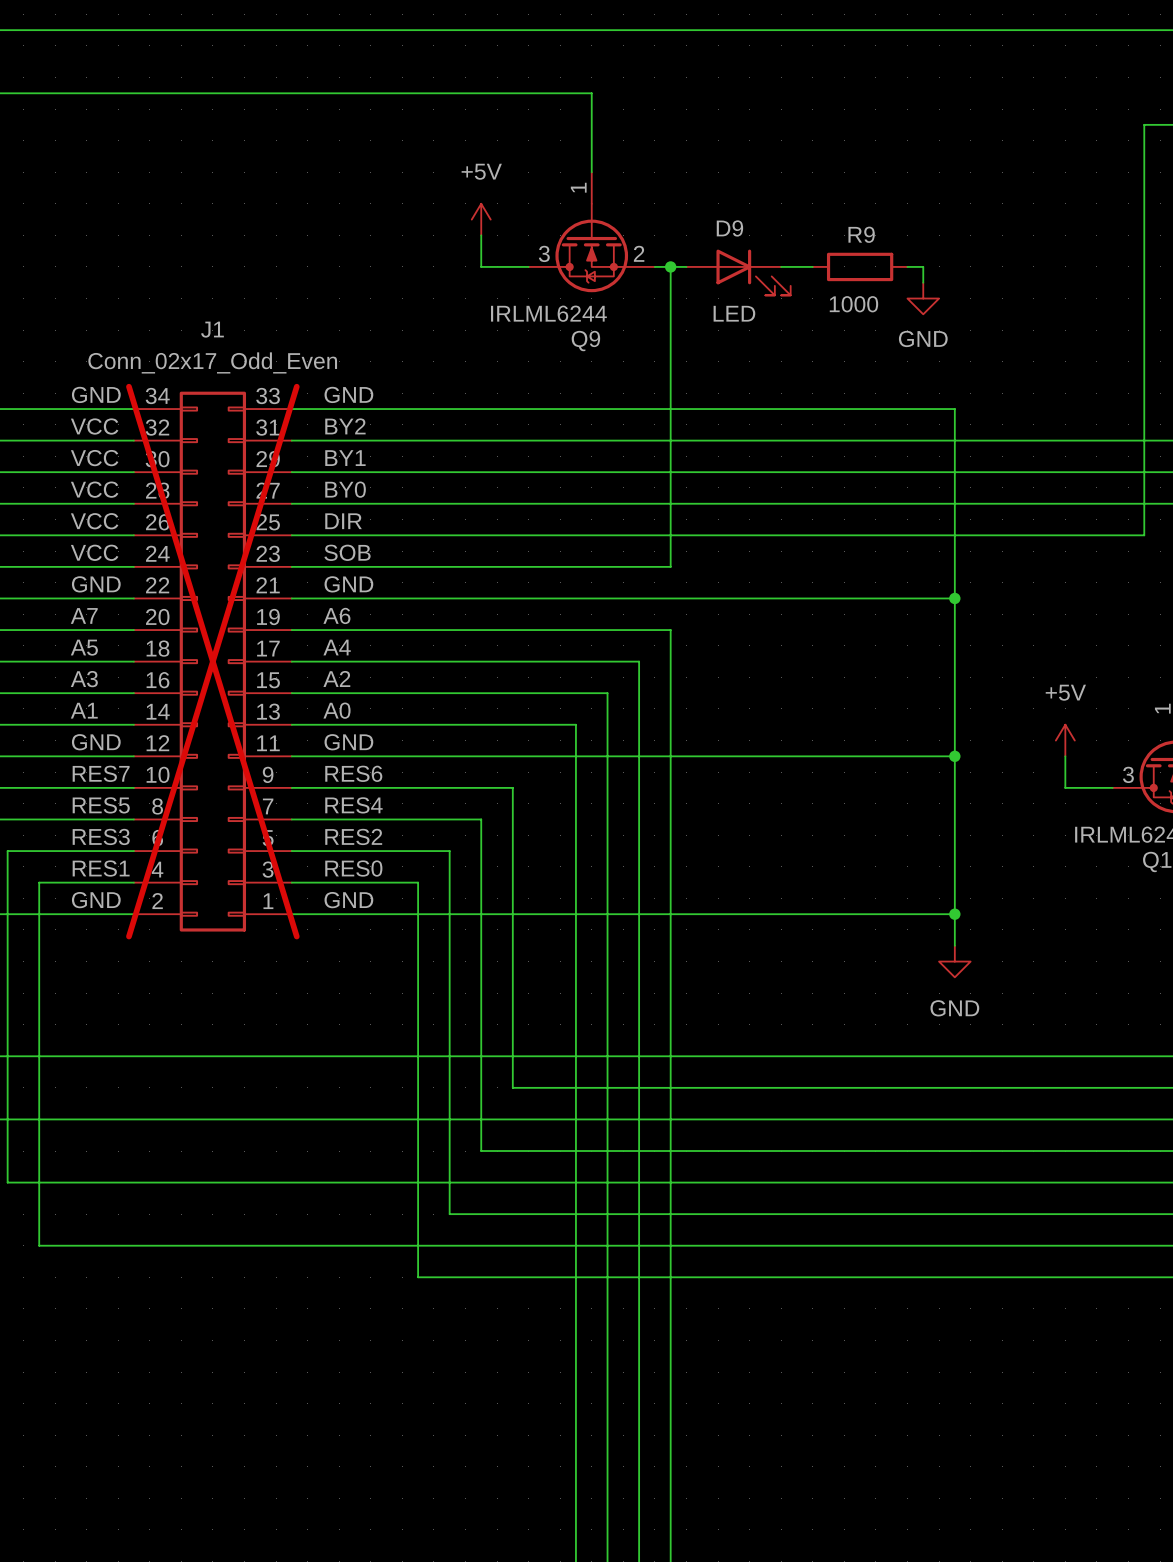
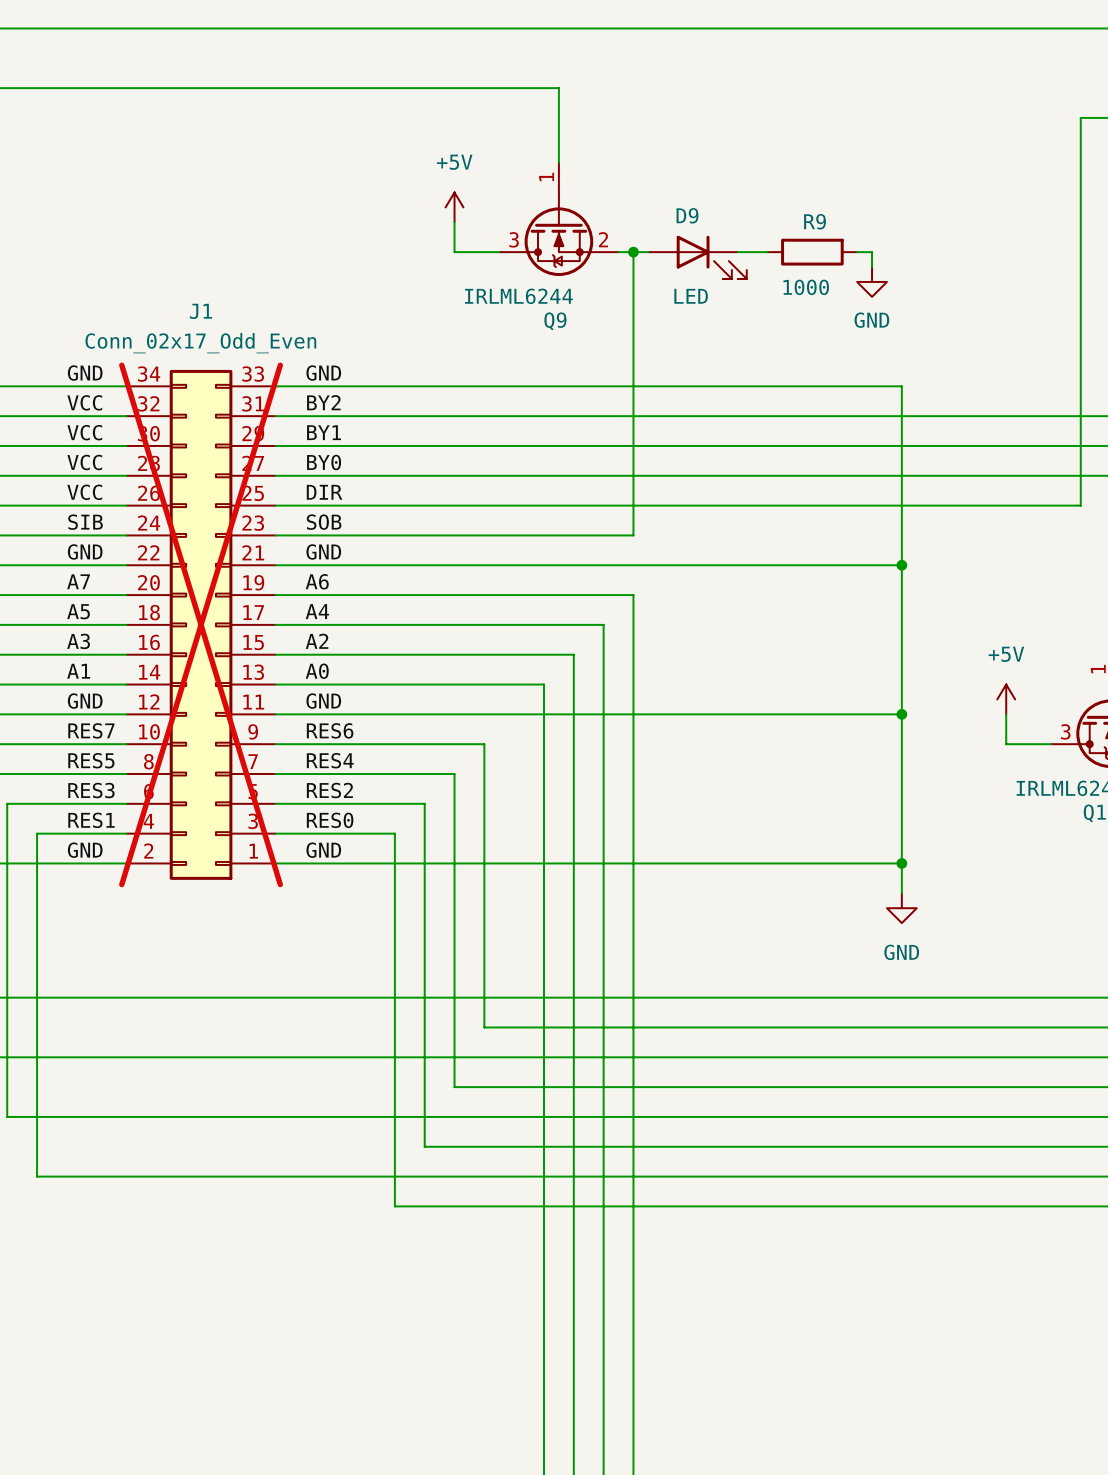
label: VCC (94, 552) -> SIB (85, 522)

